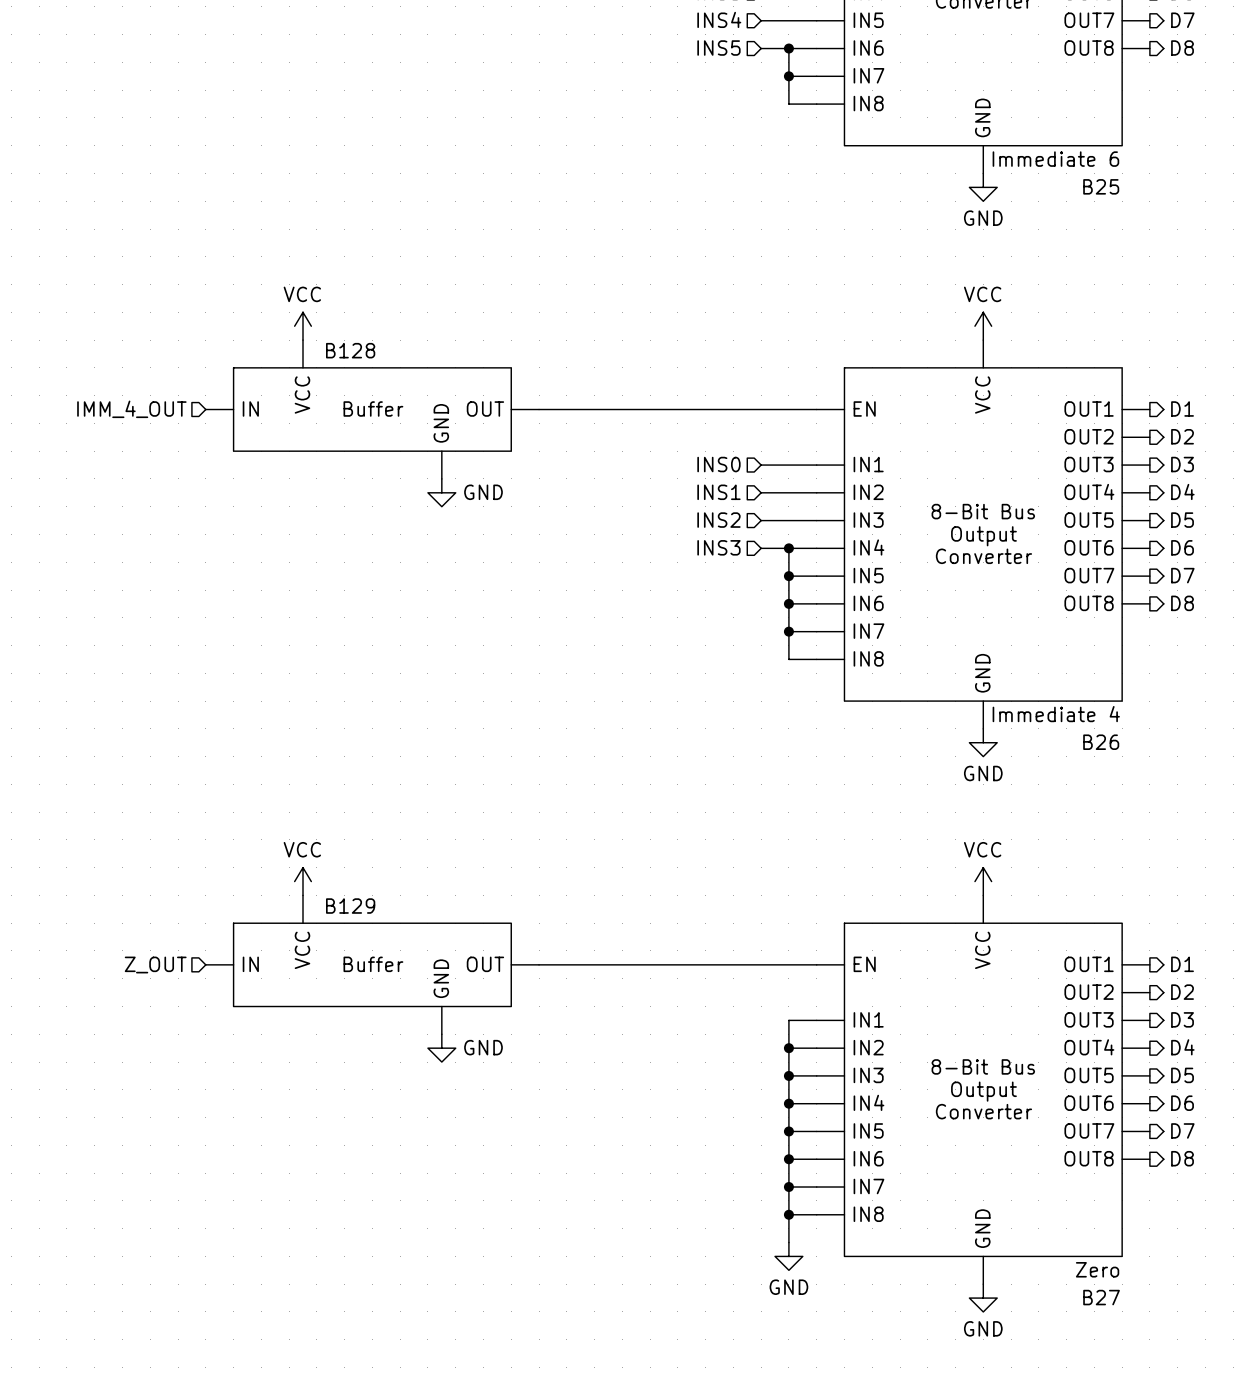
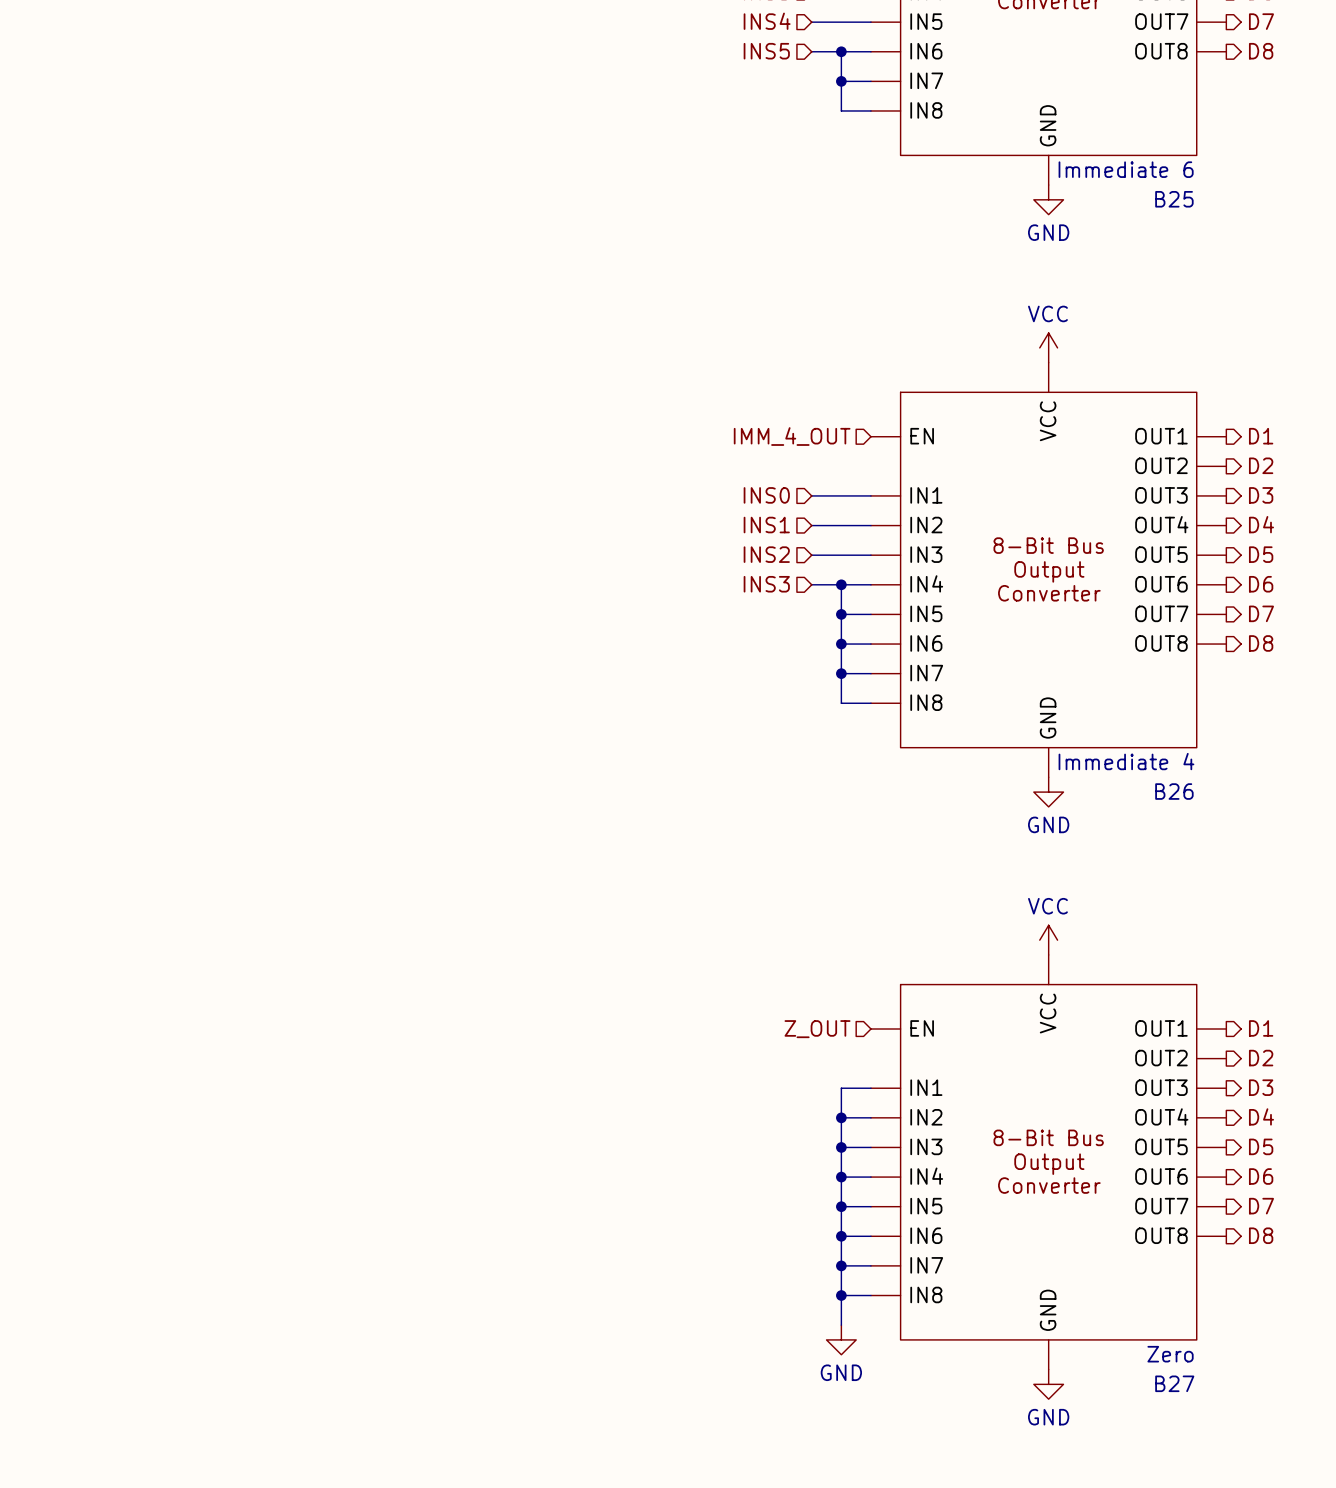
power symbol: VCC (303, 326) -> none
hierarchical label: IMM_4_OUT (131, 409) -> none
B128: (372, 409) -> none
wire: (539, 409) (816, 409) -> none
hierarchical label: none -> IMM_4_OUT (792, 436)
power symbol: GND (441, 492) -> none
power symbol: VCC (303, 881) -> none
B129: (372, 964) -> none
wire: (539, 964) (816, 964) -> none
hierarchical label: Z_OUT (155, 965) -> none
hierarchical label: none -> Z_OUT (817, 1029)
power symbol: GND (441, 1048) -> none

